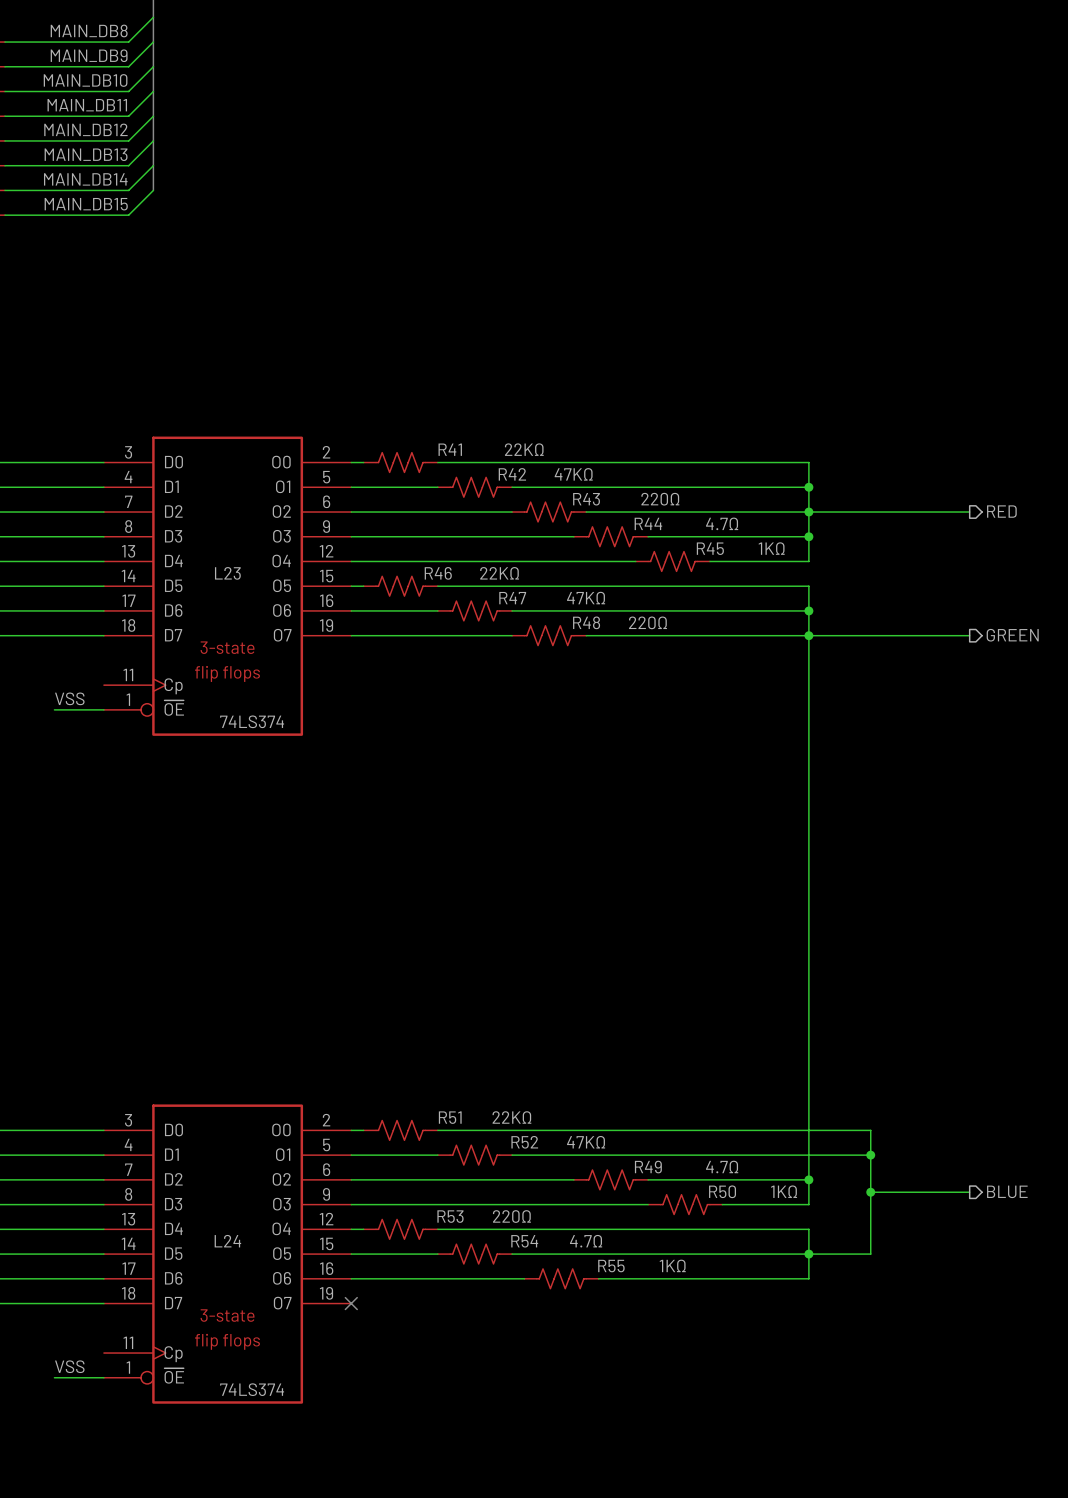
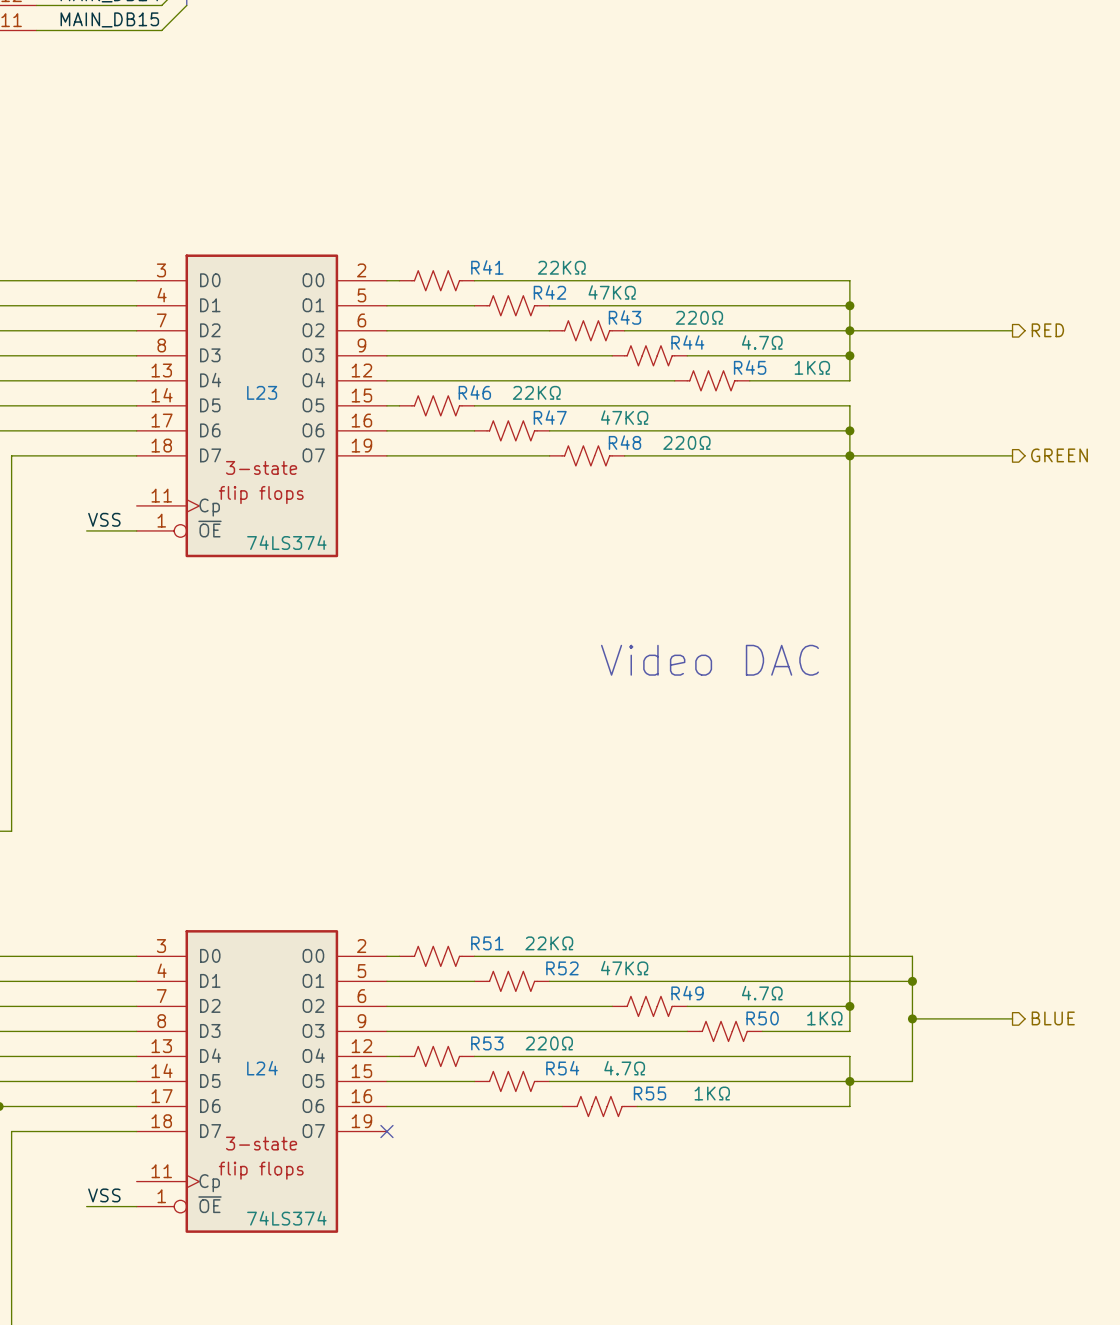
text: none -> Video DAC (709, 660)

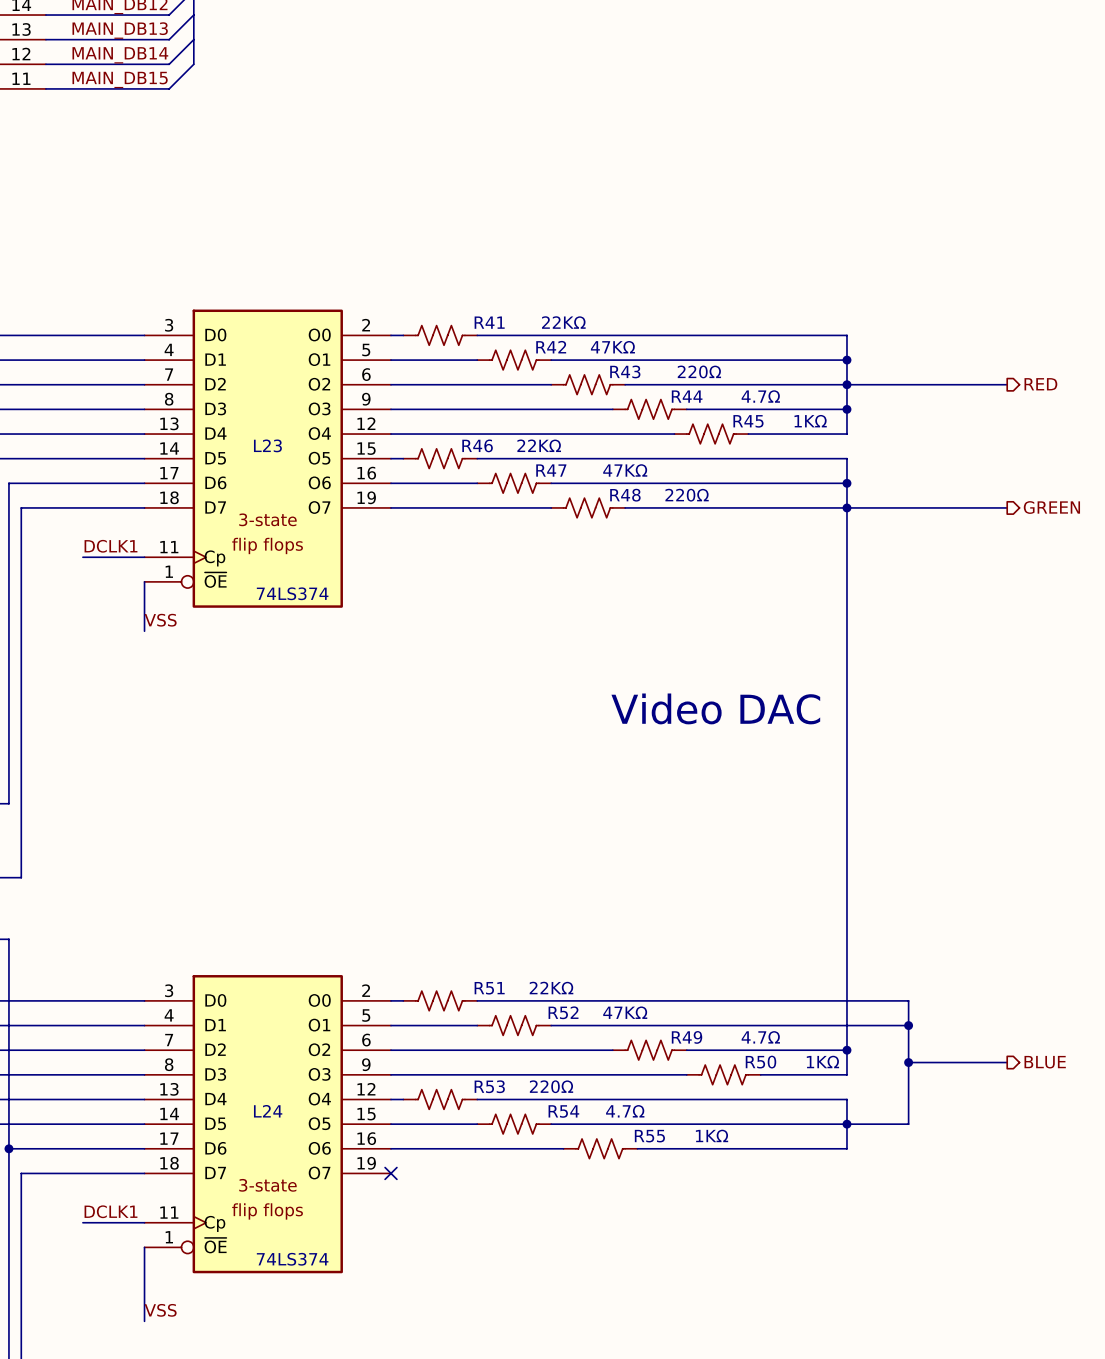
label: none -> DCLK1 (110, 546)
wire: none -> (82, 557) (144, 557)
label position: VSS (104, 519) -> VSS (160, 620)
wire: (86, 530) (136, 530) -> (144, 631) (144, 581)
label: none -> DCLK1 (110, 1211)
wire: none -> (82, 1222) (144, 1222)
label position: VSS (104, 1195) -> VSS (160, 1310)
wire: (86, 1206) (136, 1206) -> (144, 1321) (144, 1247)

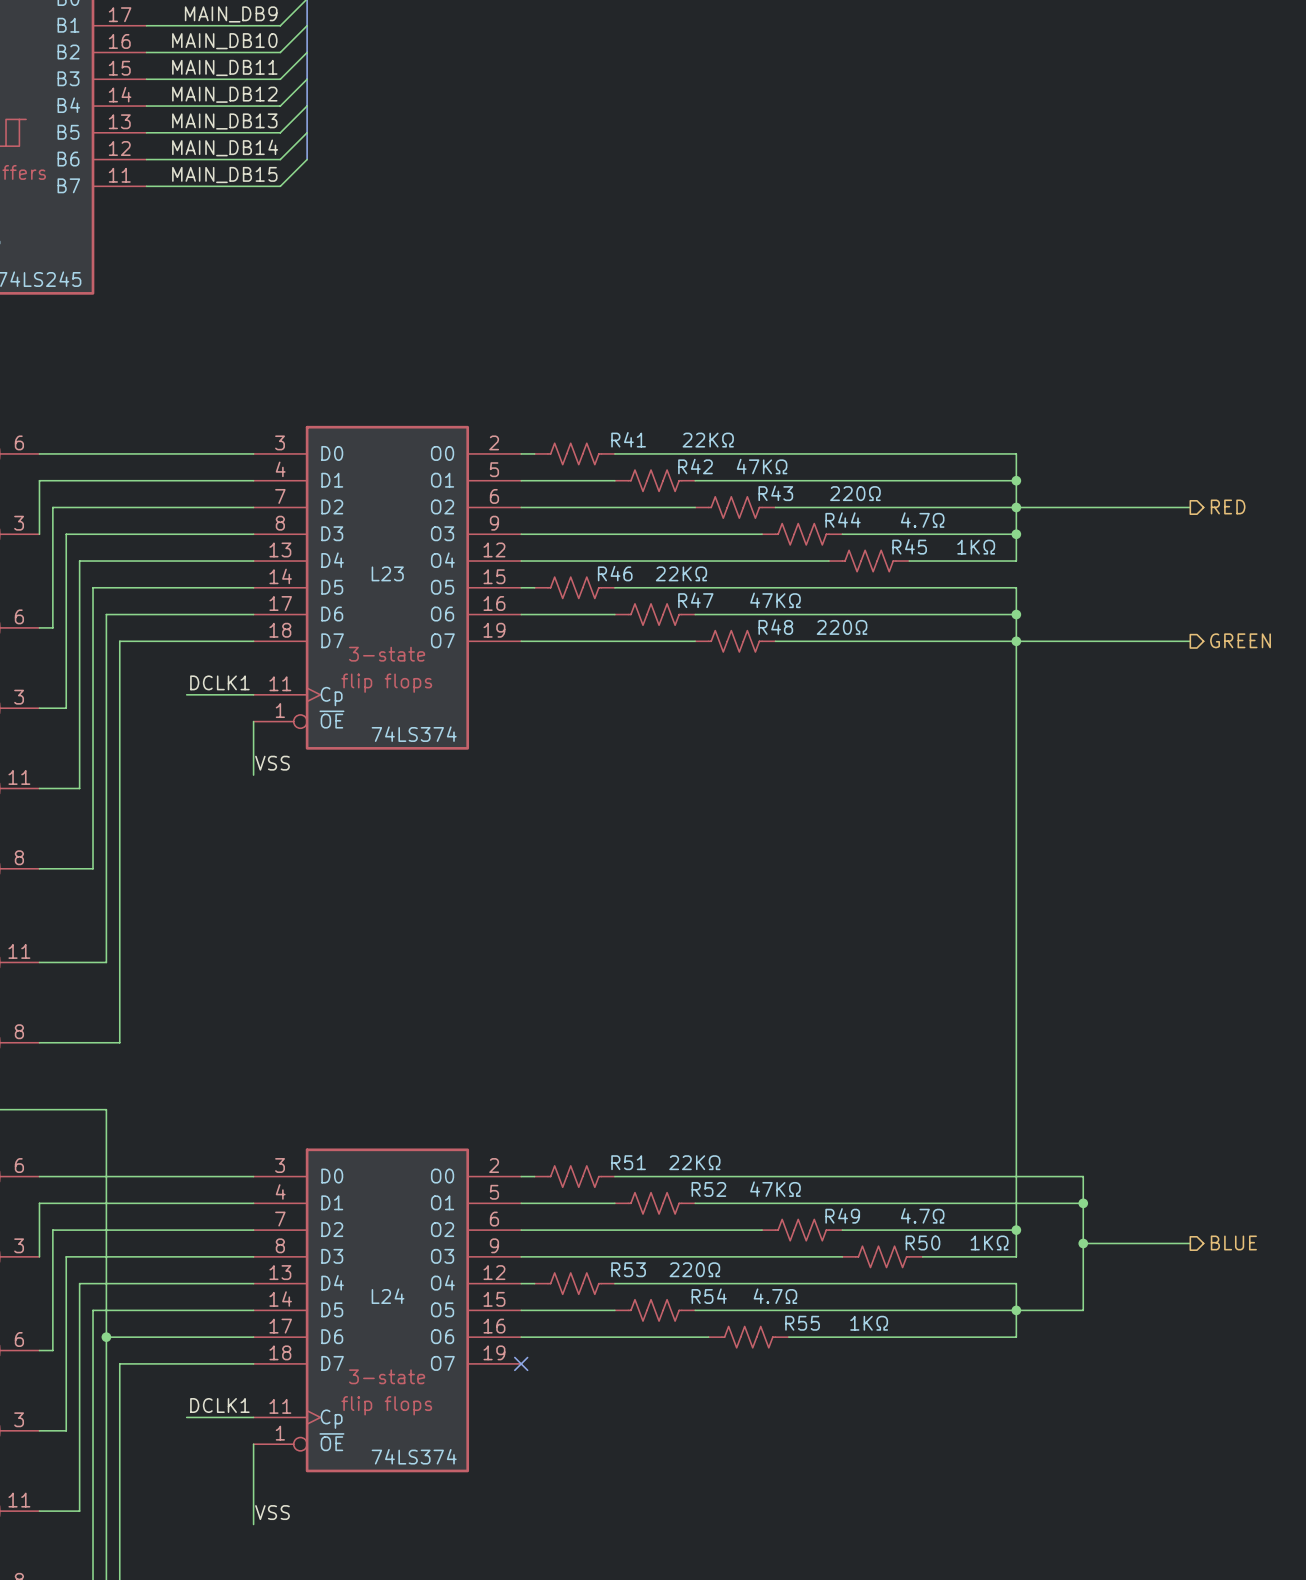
text: Video DAC (715, 708) -> none

